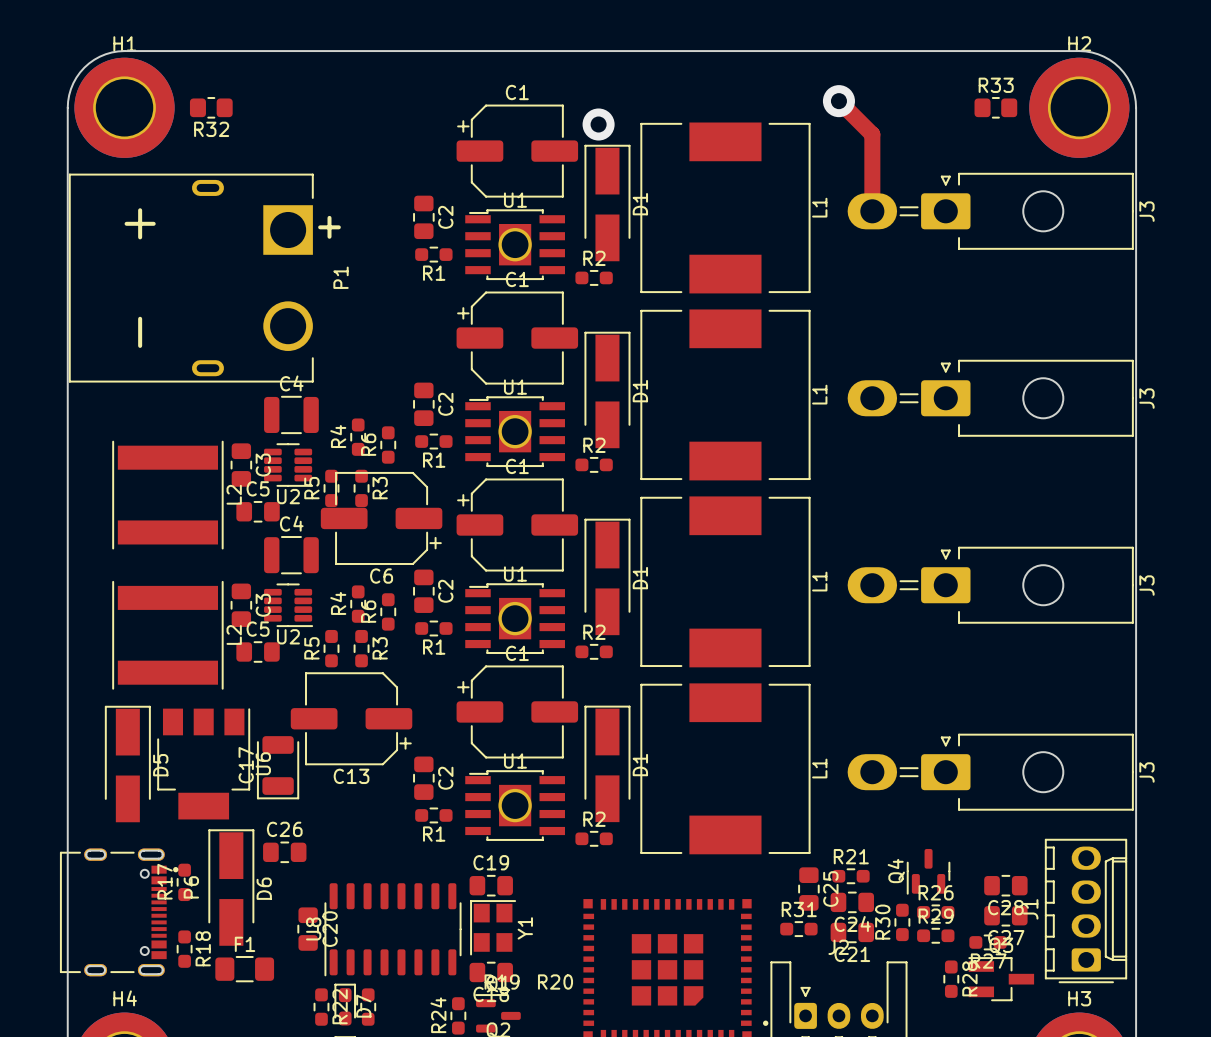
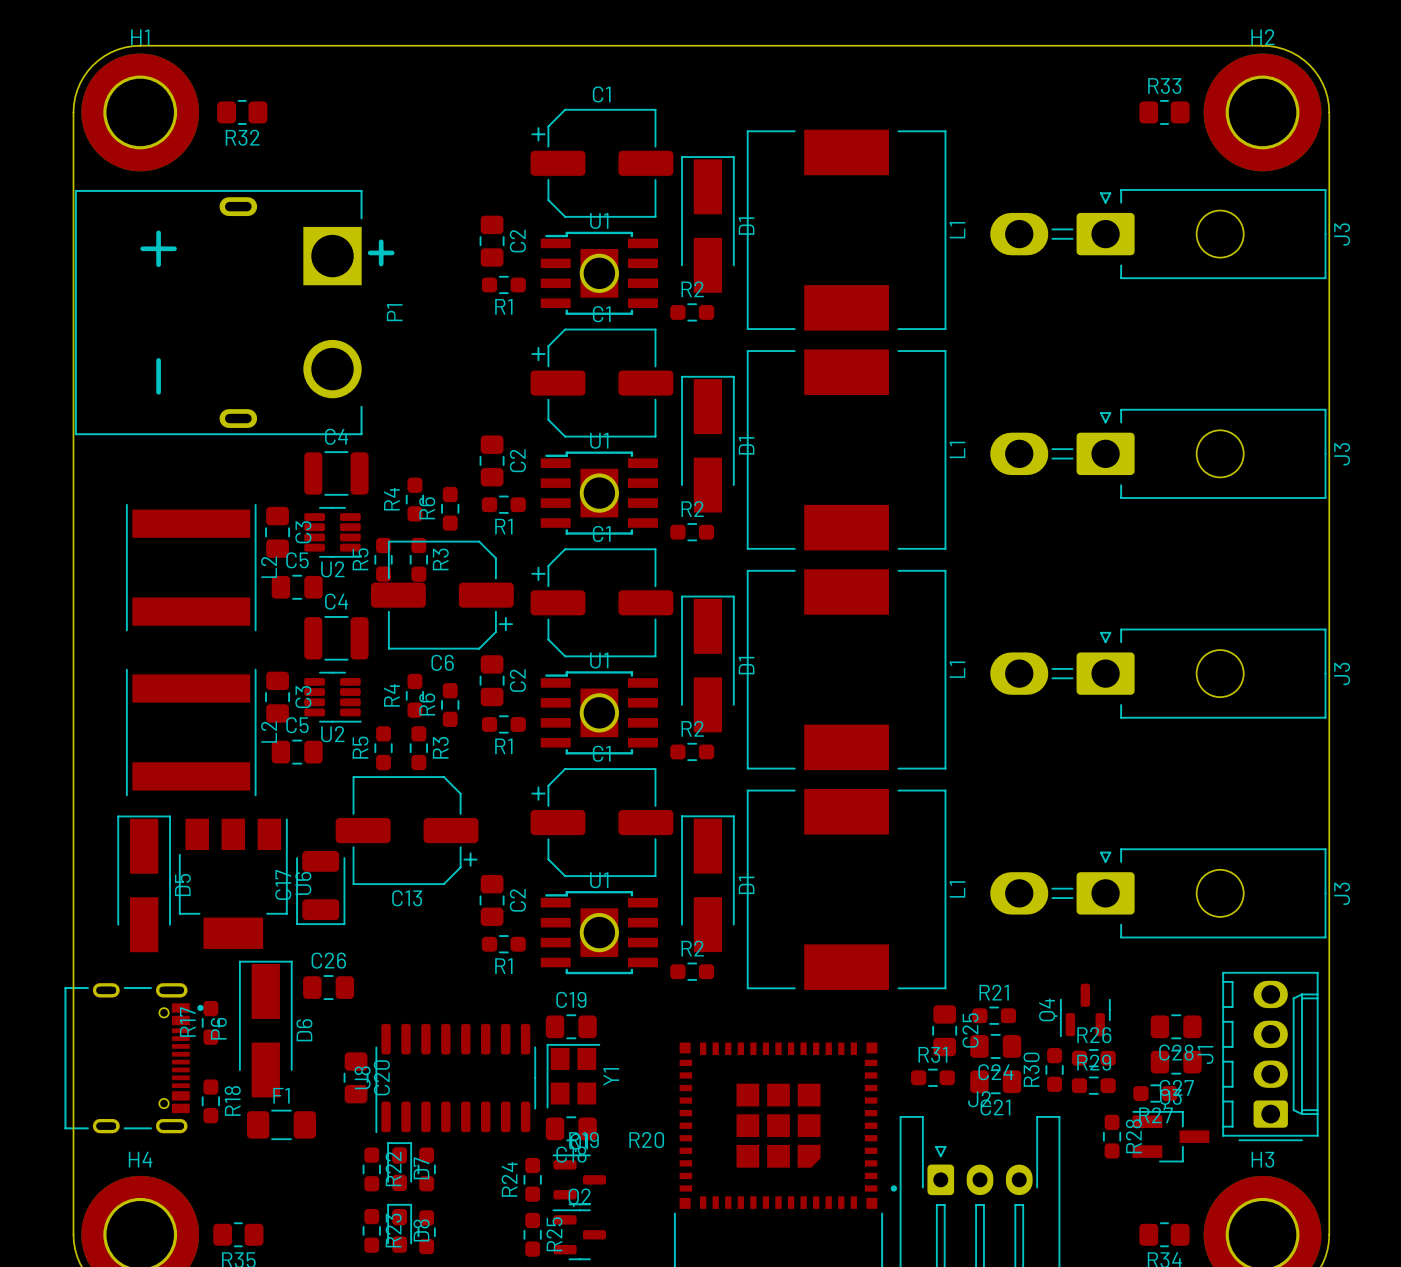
top track: (838, 101) (872, 134) (872, 211) -> none
via: (838, 101) -> none
via: (598, 124) -> none

